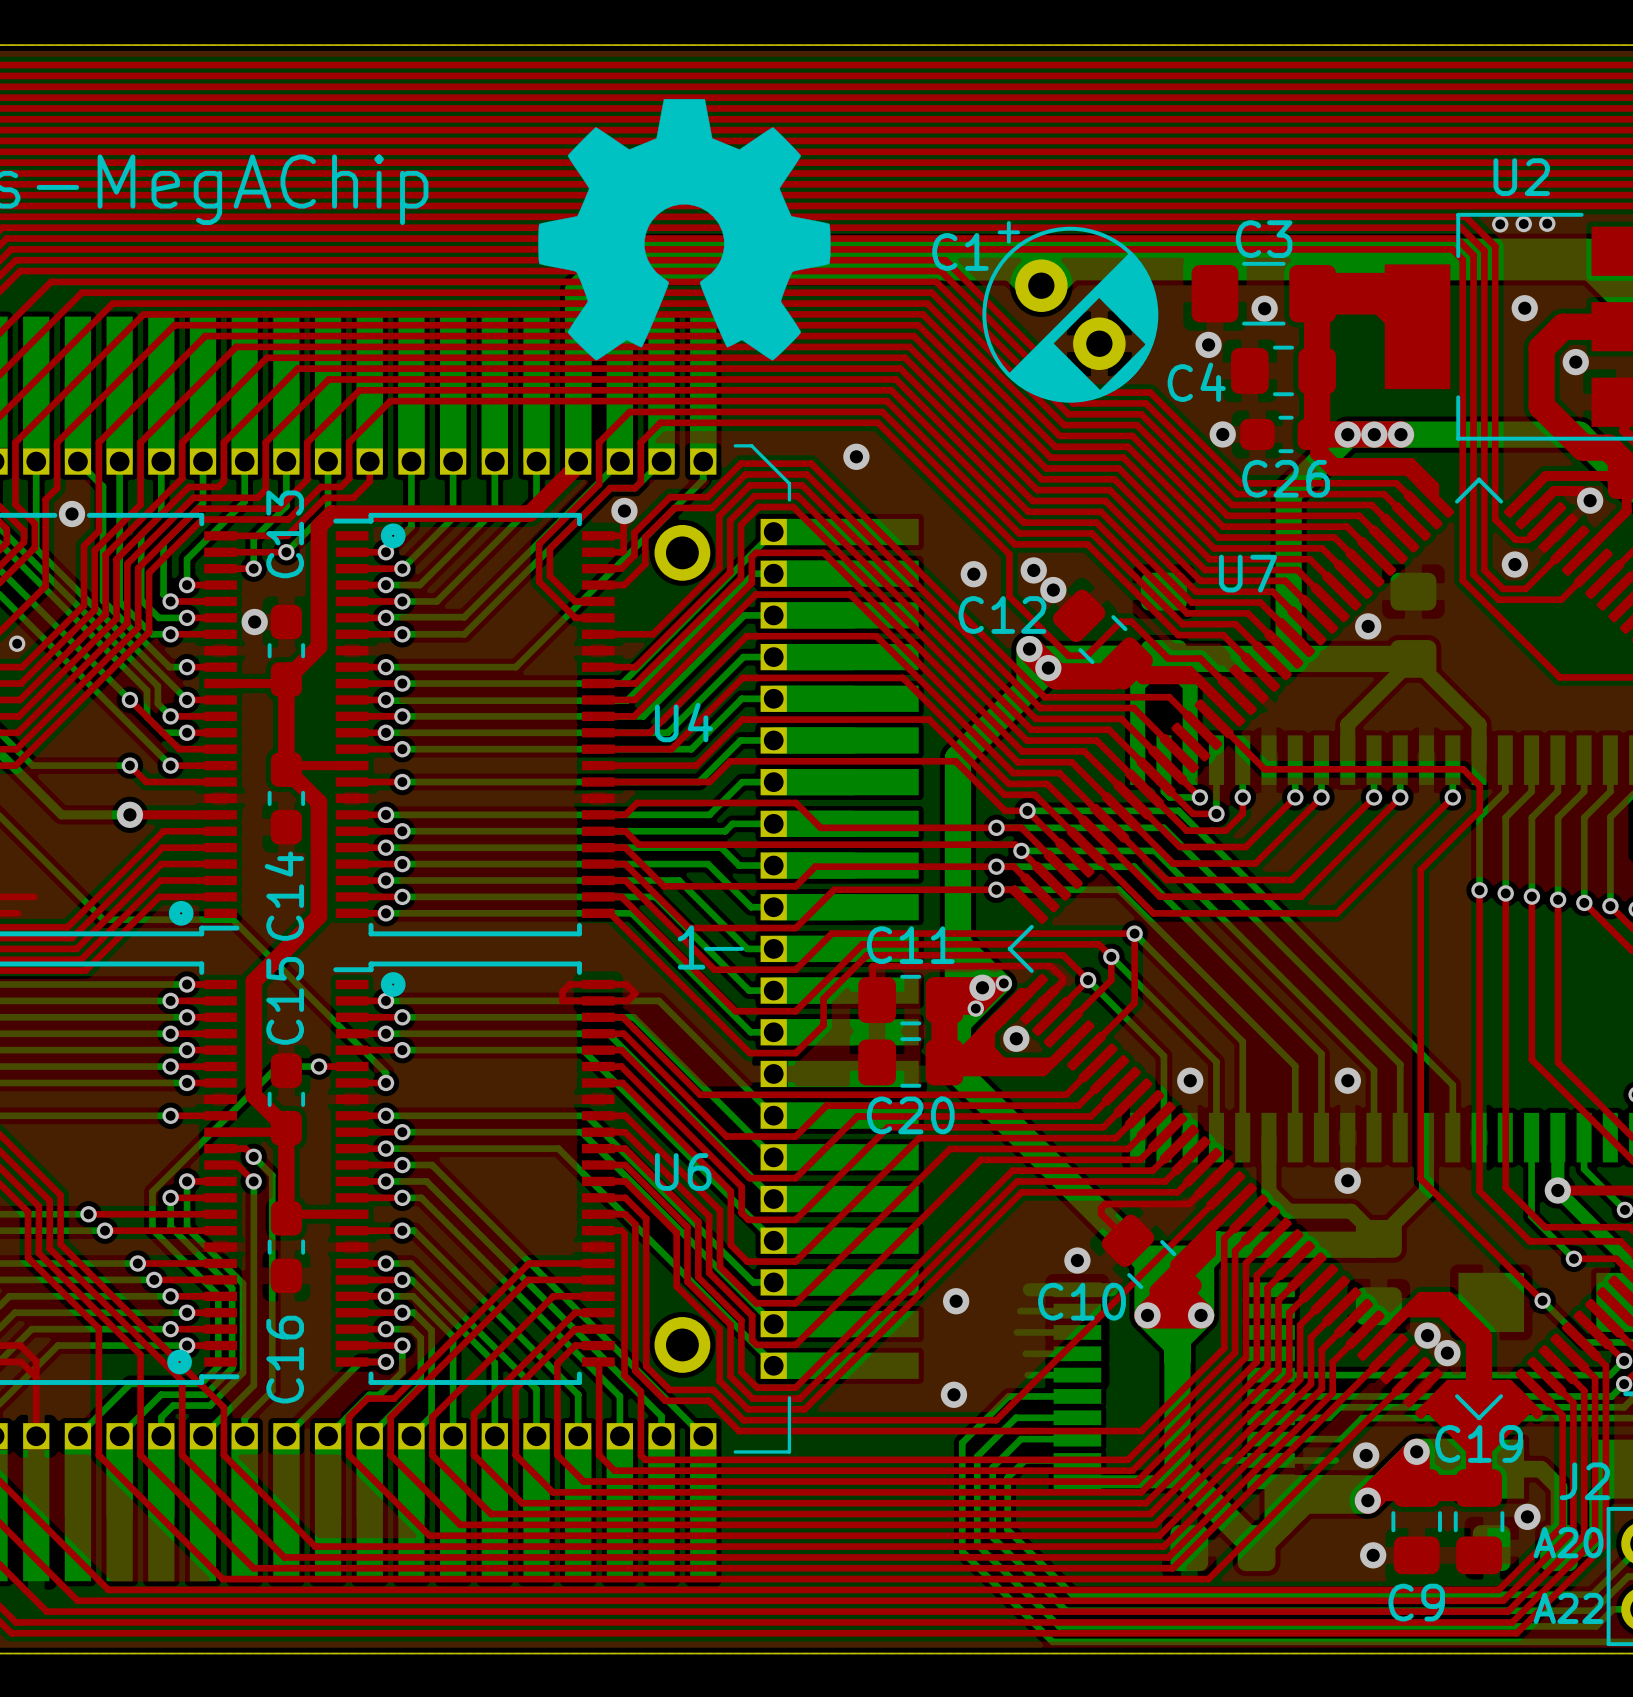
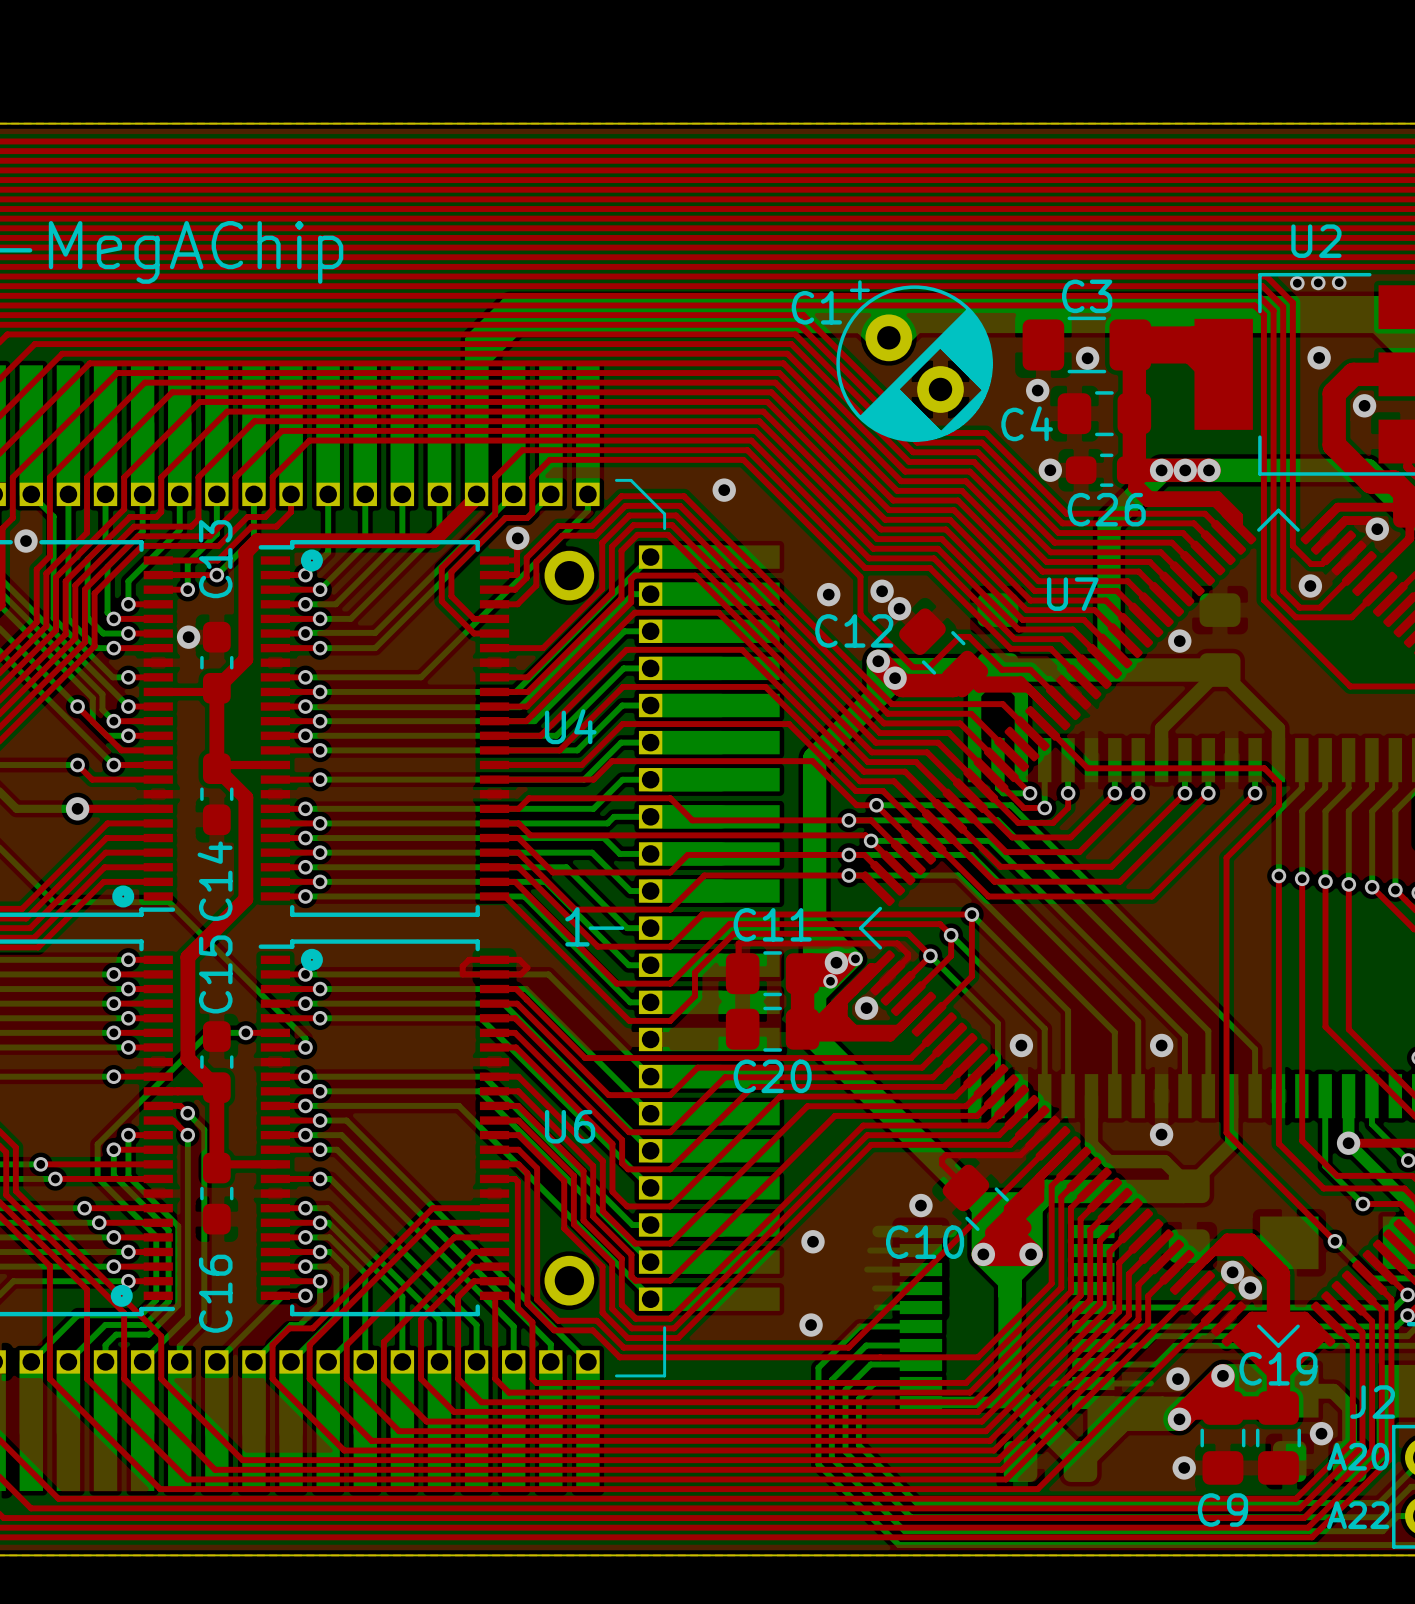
drawing: [538, 99, 831, 361] -> none

